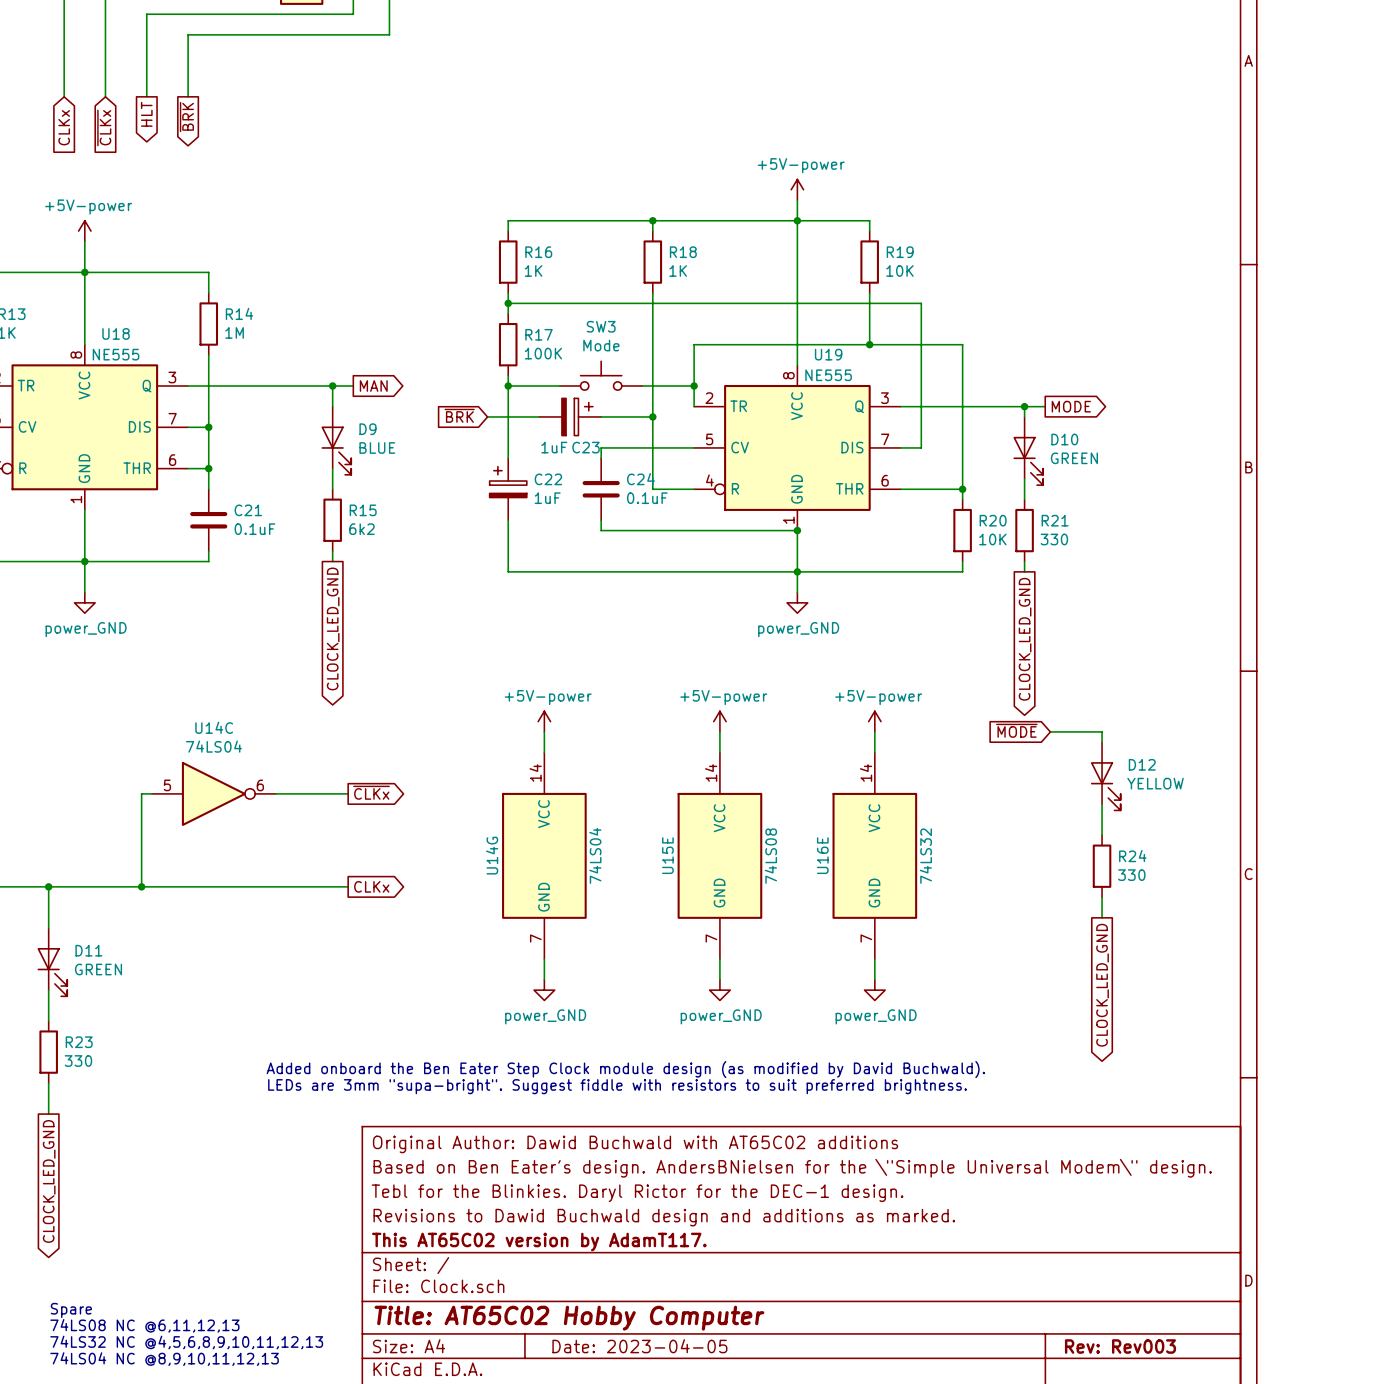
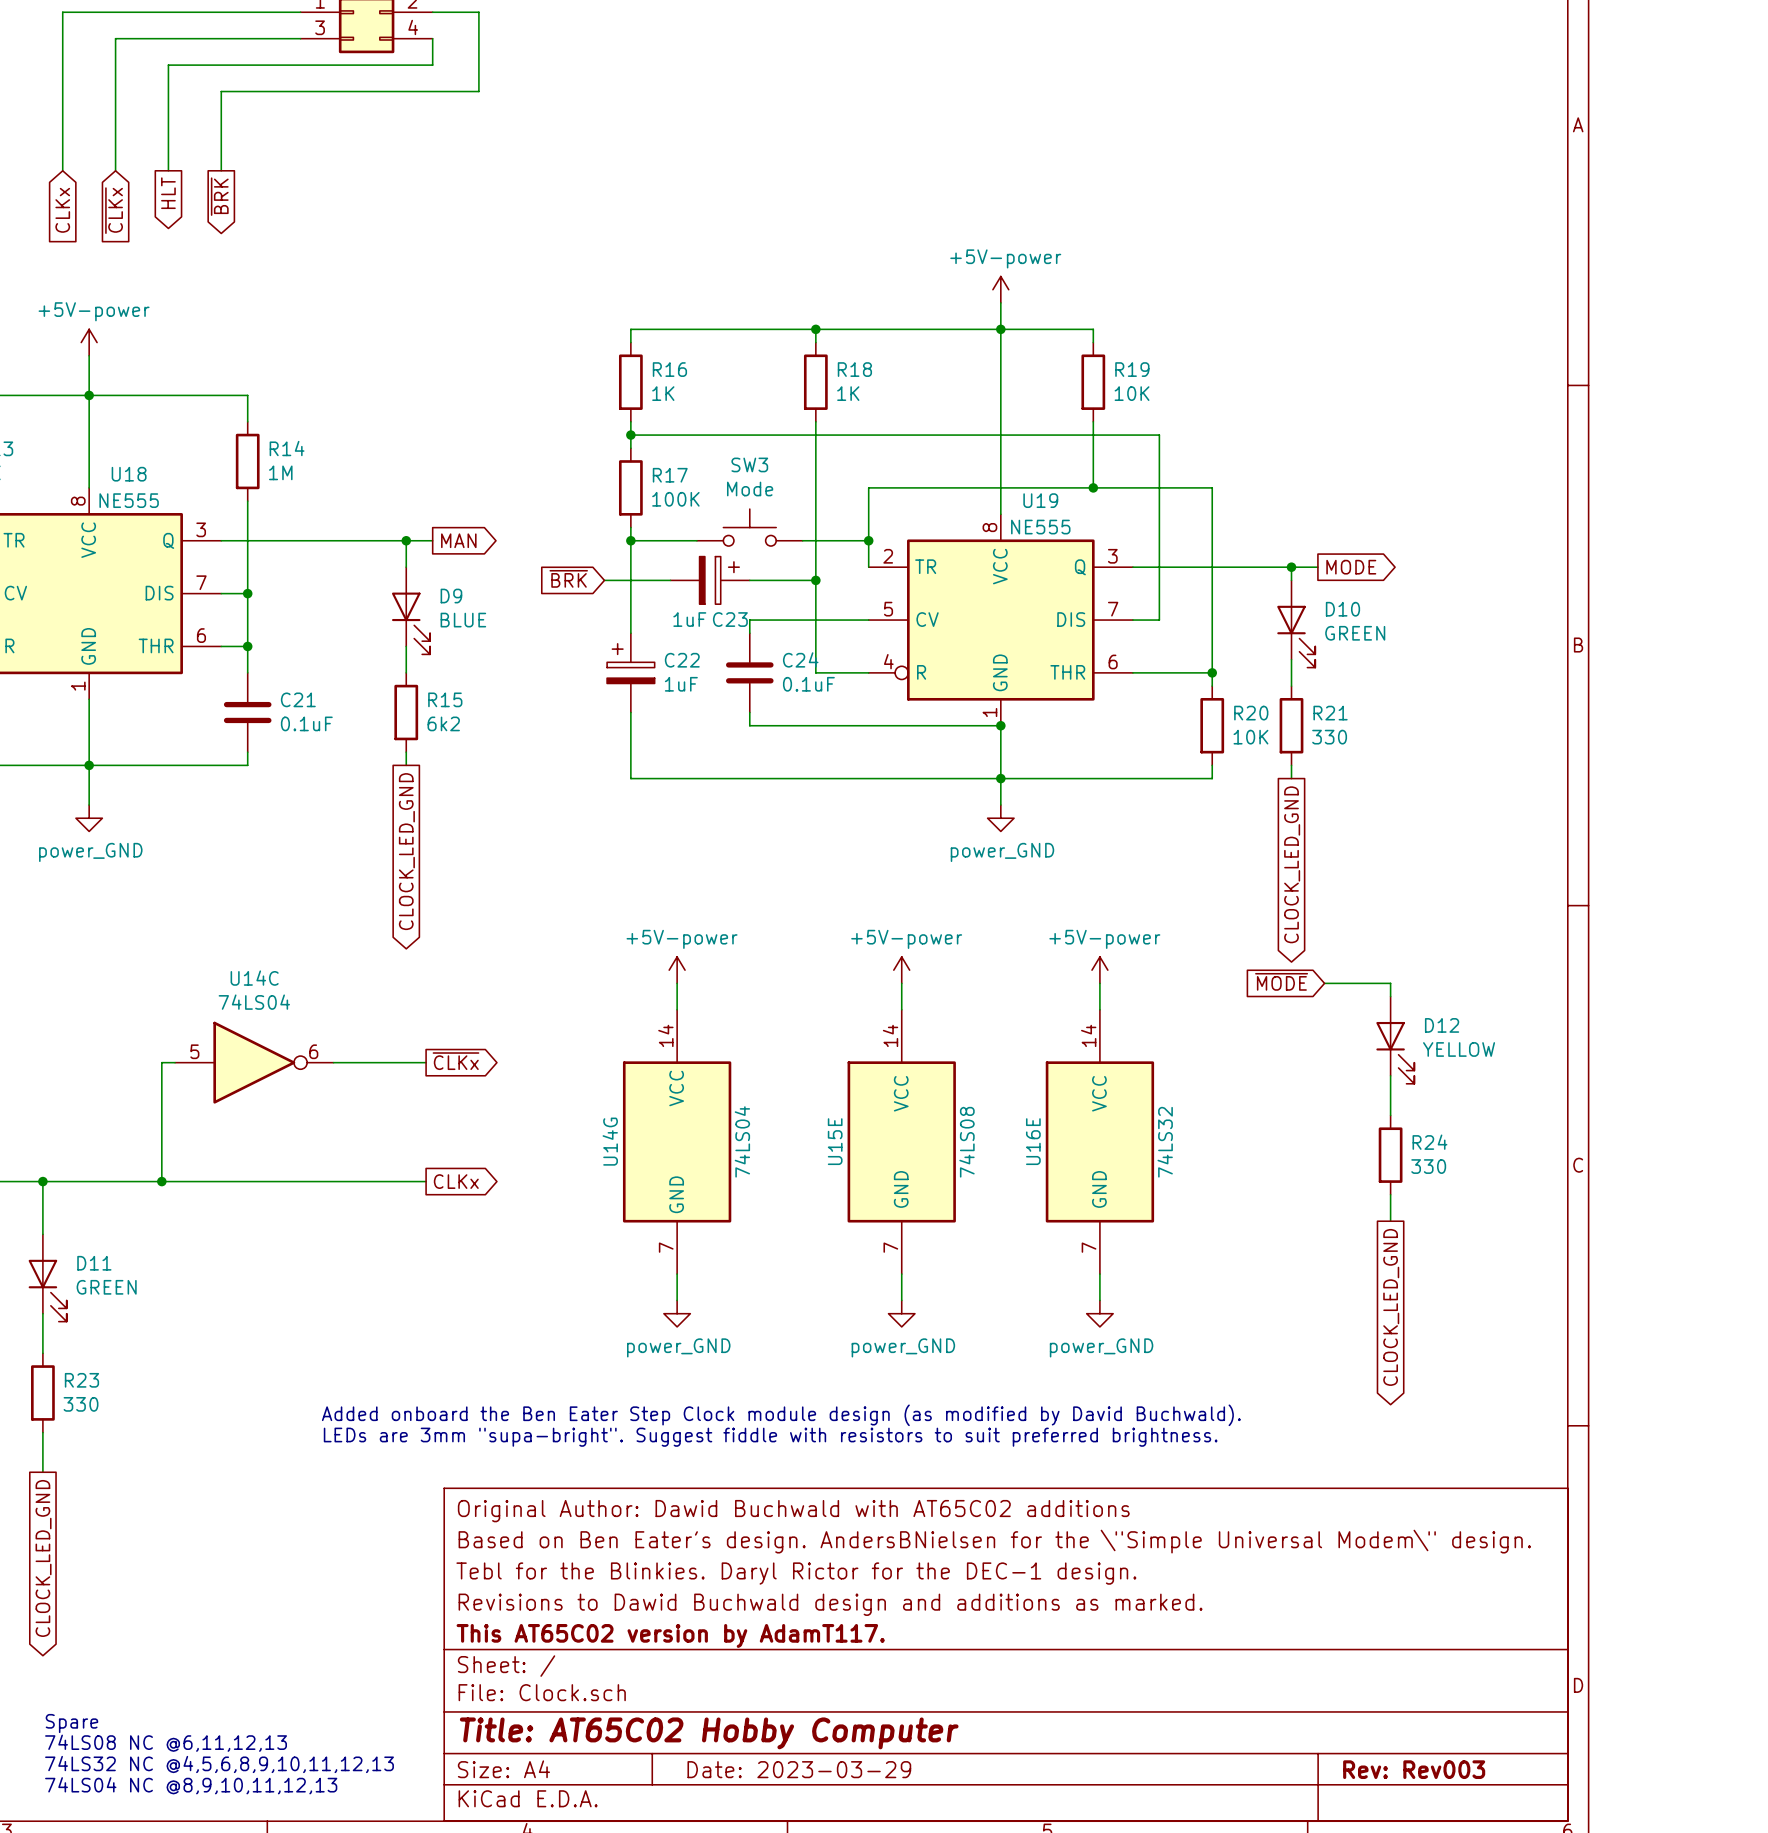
title block: Date: 2023-04-05 (639, 1346) -> Date: 2023-03-29 (799, 1769)

